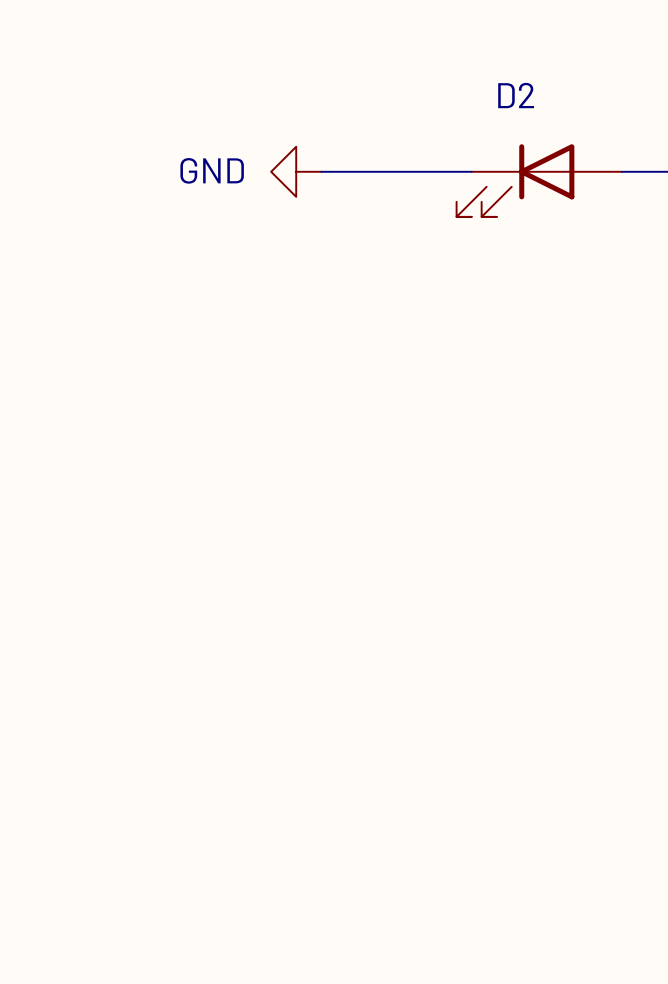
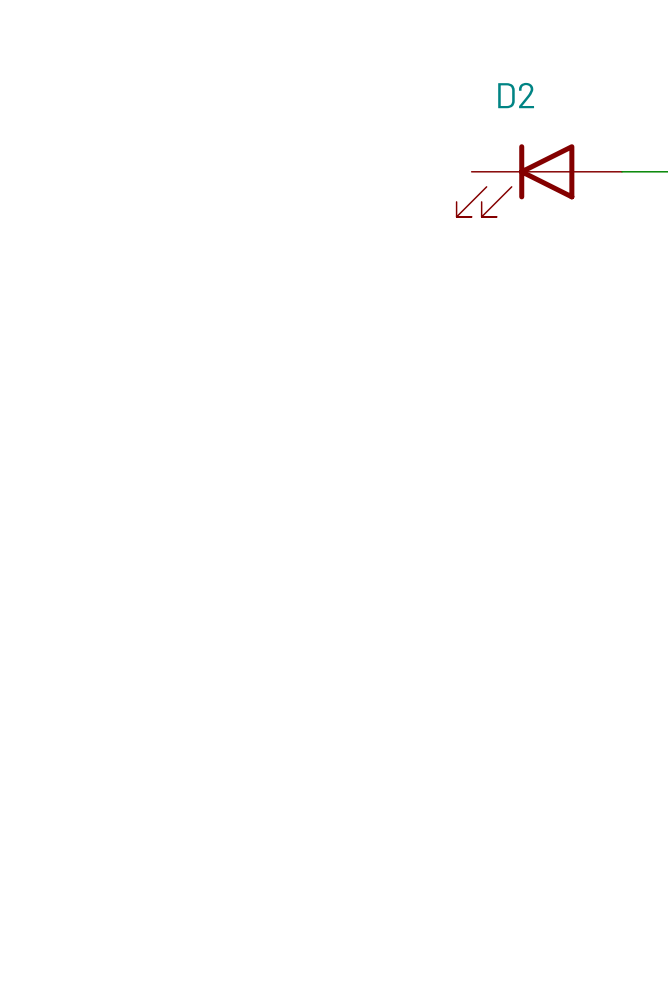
power symbol: GND (296, 171) -> none
wire: (321, 171) (471, 171) -> none

